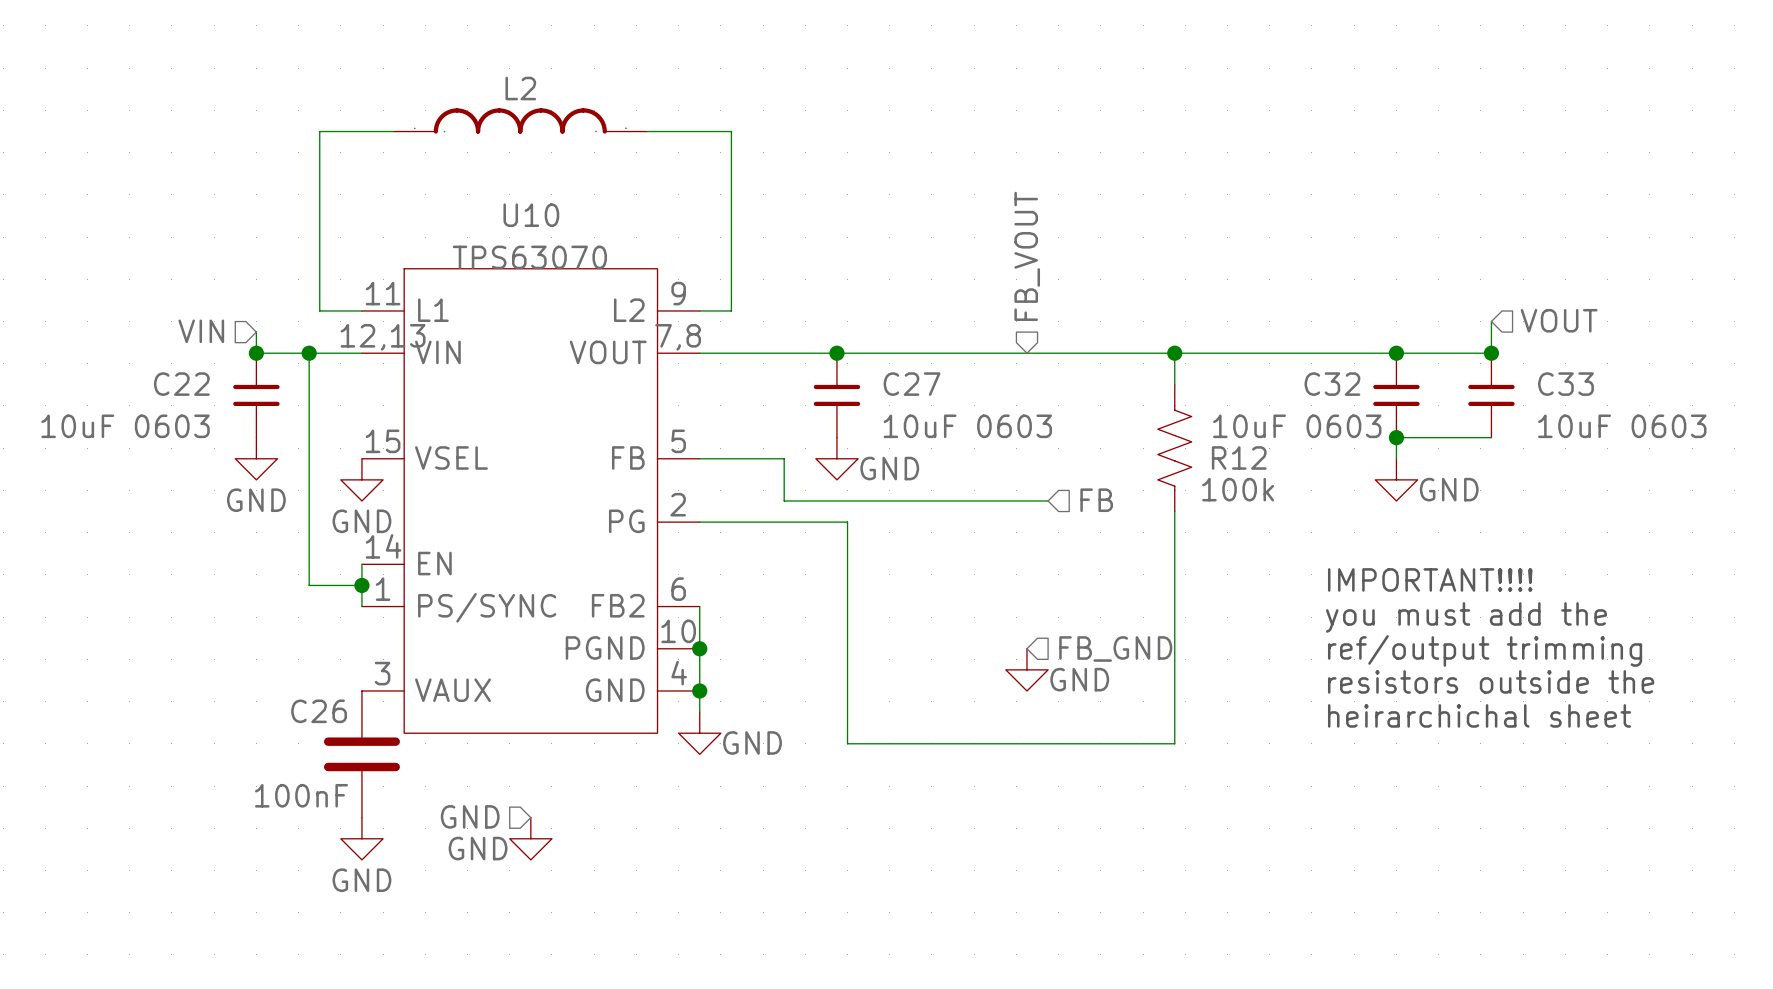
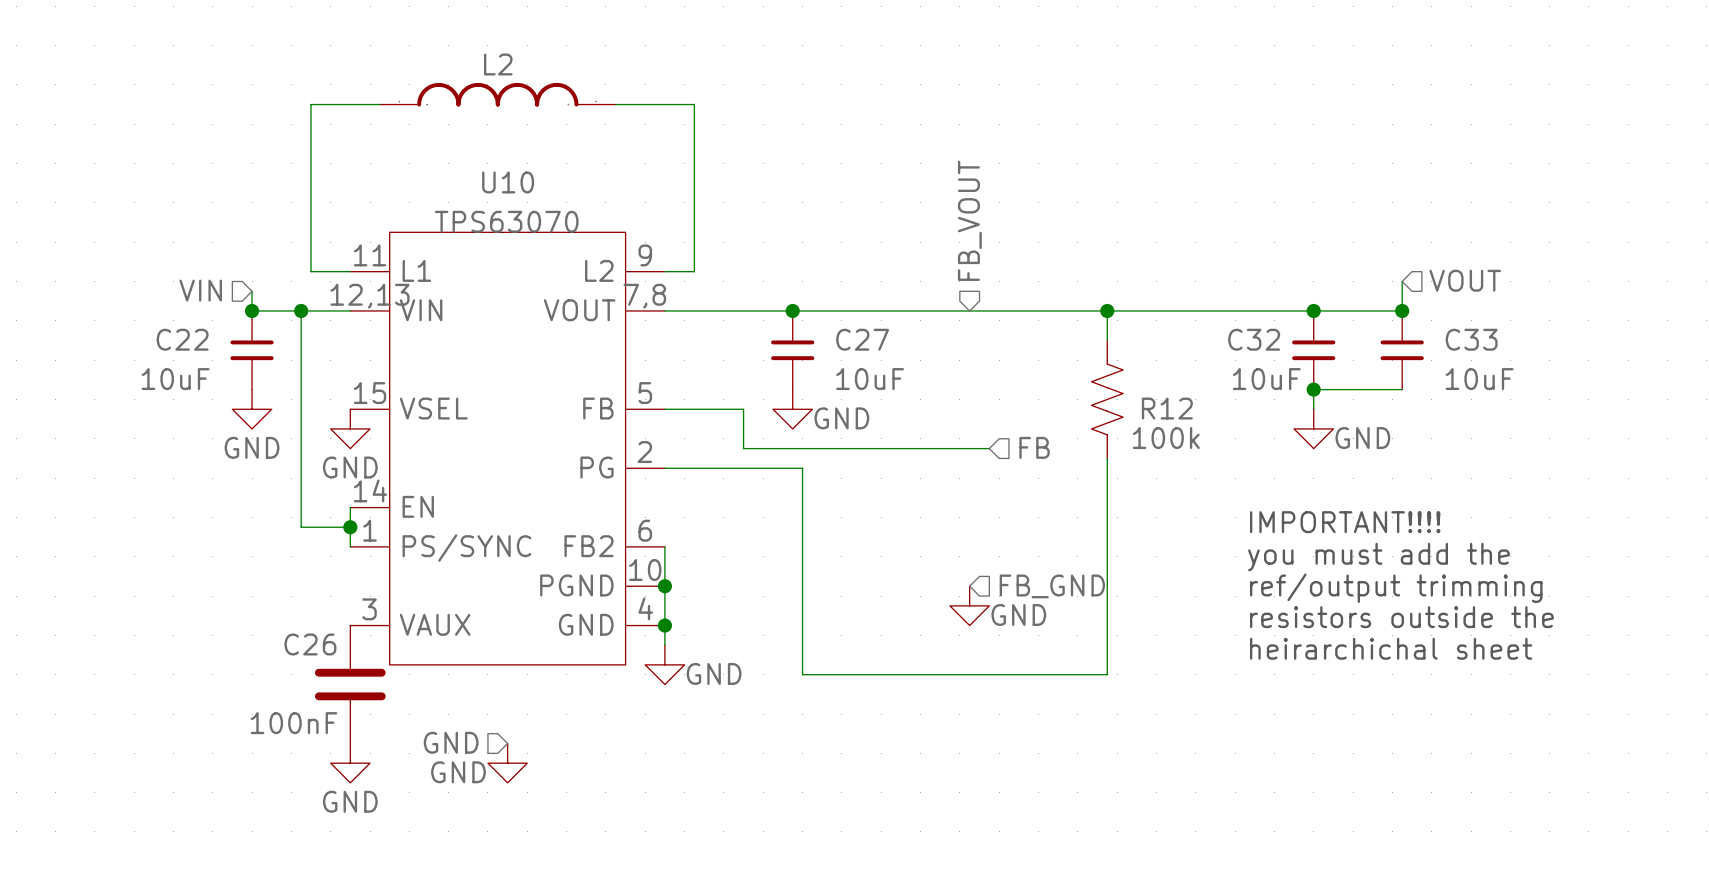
C22 value: 10uF 0603 (125, 426) -> 10uF (175, 379)
C27 value: 10uF 0603 (967, 426) -> 10uF (870, 379)
C32 value: 10uF 0603 (1297, 426) -> 10uF (1266, 379)
C33 value: 10uF 0603 (1622, 426) -> 10uF (1479, 379)

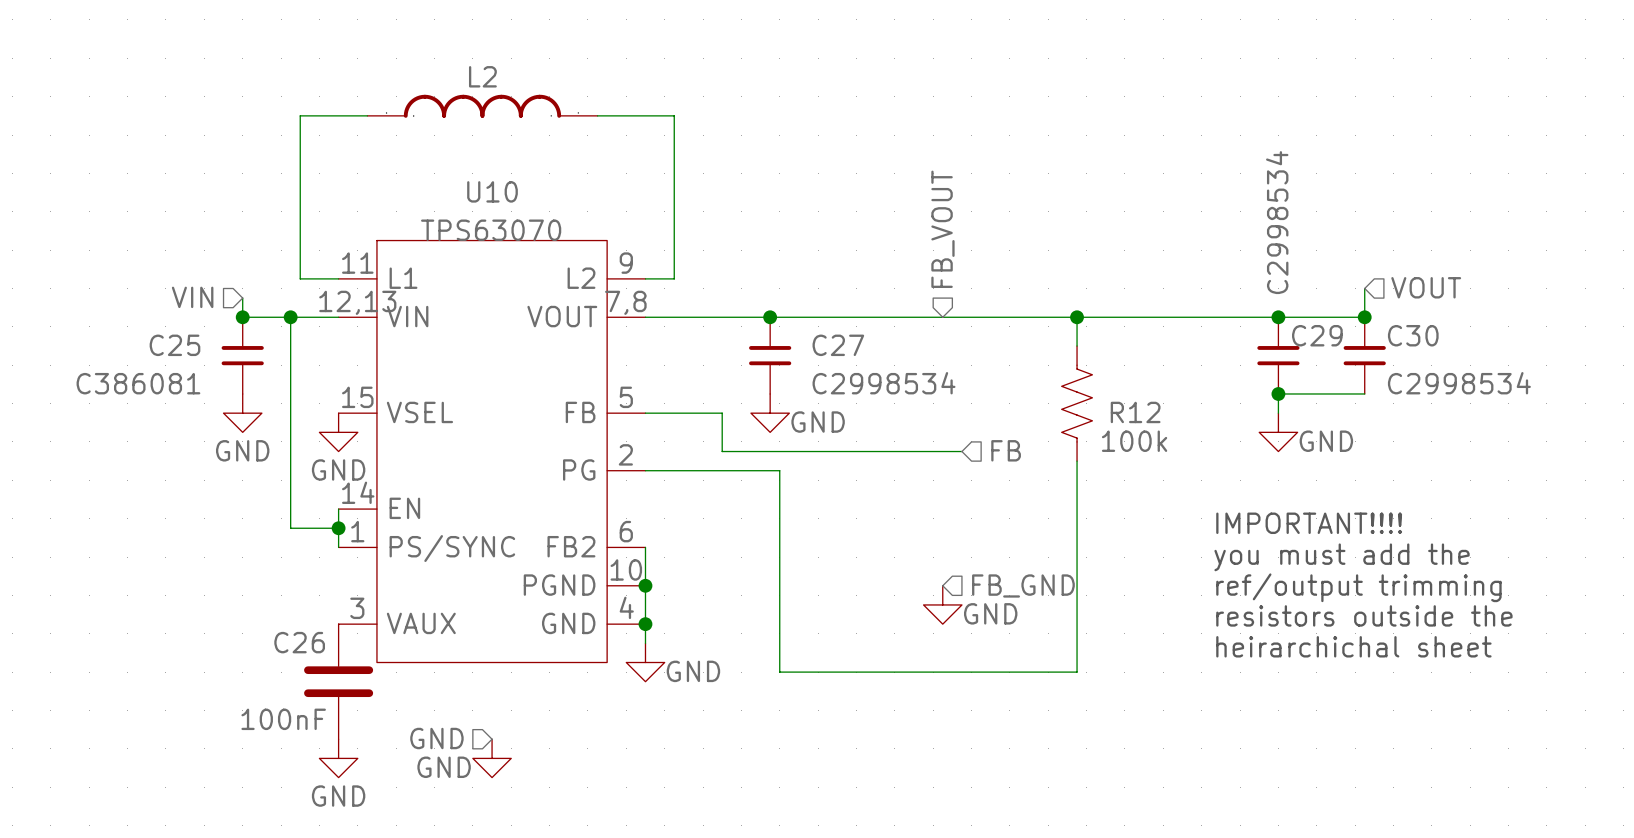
C22 name: C22 (182, 339) -> C25 (174, 345)
C32 name: C32 (1254, 339) -> C29 (1317, 335)
C33 name: C33 (1471, 339) -> C30 (1413, 335)
C22 value: 10uF (175, 379) -> C386081 (138, 383)
C27 value: 10uF (870, 379) -> C2998534 (884, 383)
C32 value: 10uF (1266, 379) -> C2998534 (1277, 222)
C33 value: 10uF (1479, 379) -> C2998534 (1459, 383)

